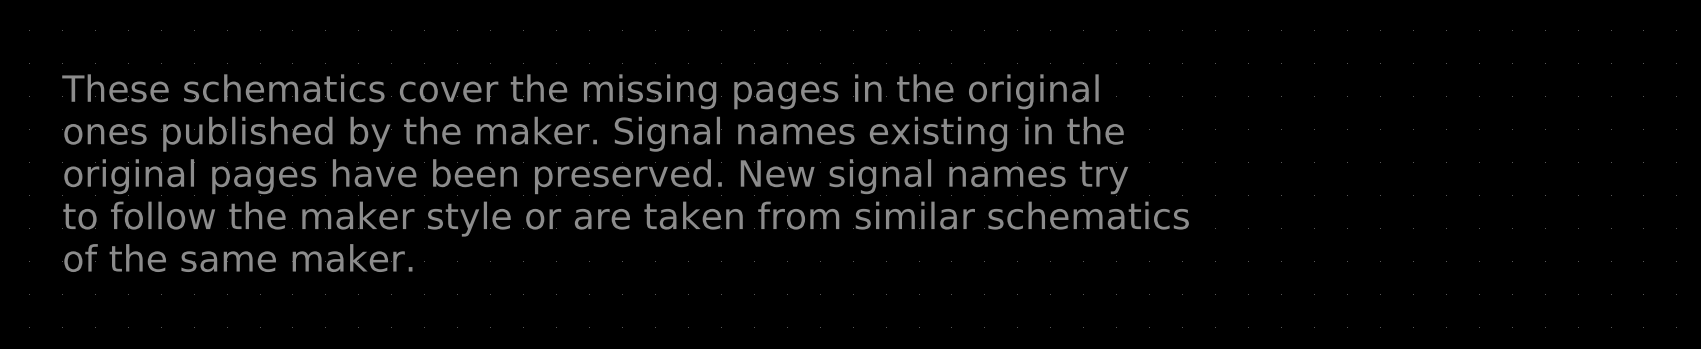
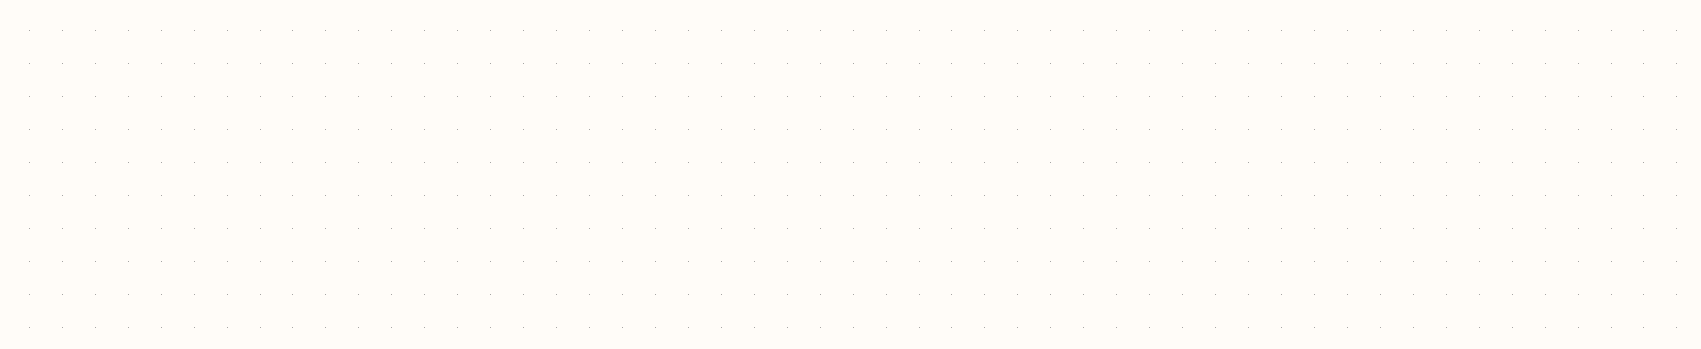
text: These schematics cover the missing pages in the original (580, 91) -> none
text: ones published by the maker. Signal names existing in the (594, 134) -> none
text: original pages have been preserved. New signal names try (596, 176) -> none
text: to follow the maker style or are taken from similar schematics (626, 219) -> none
text: of the same maker. (238, 258) -> none

